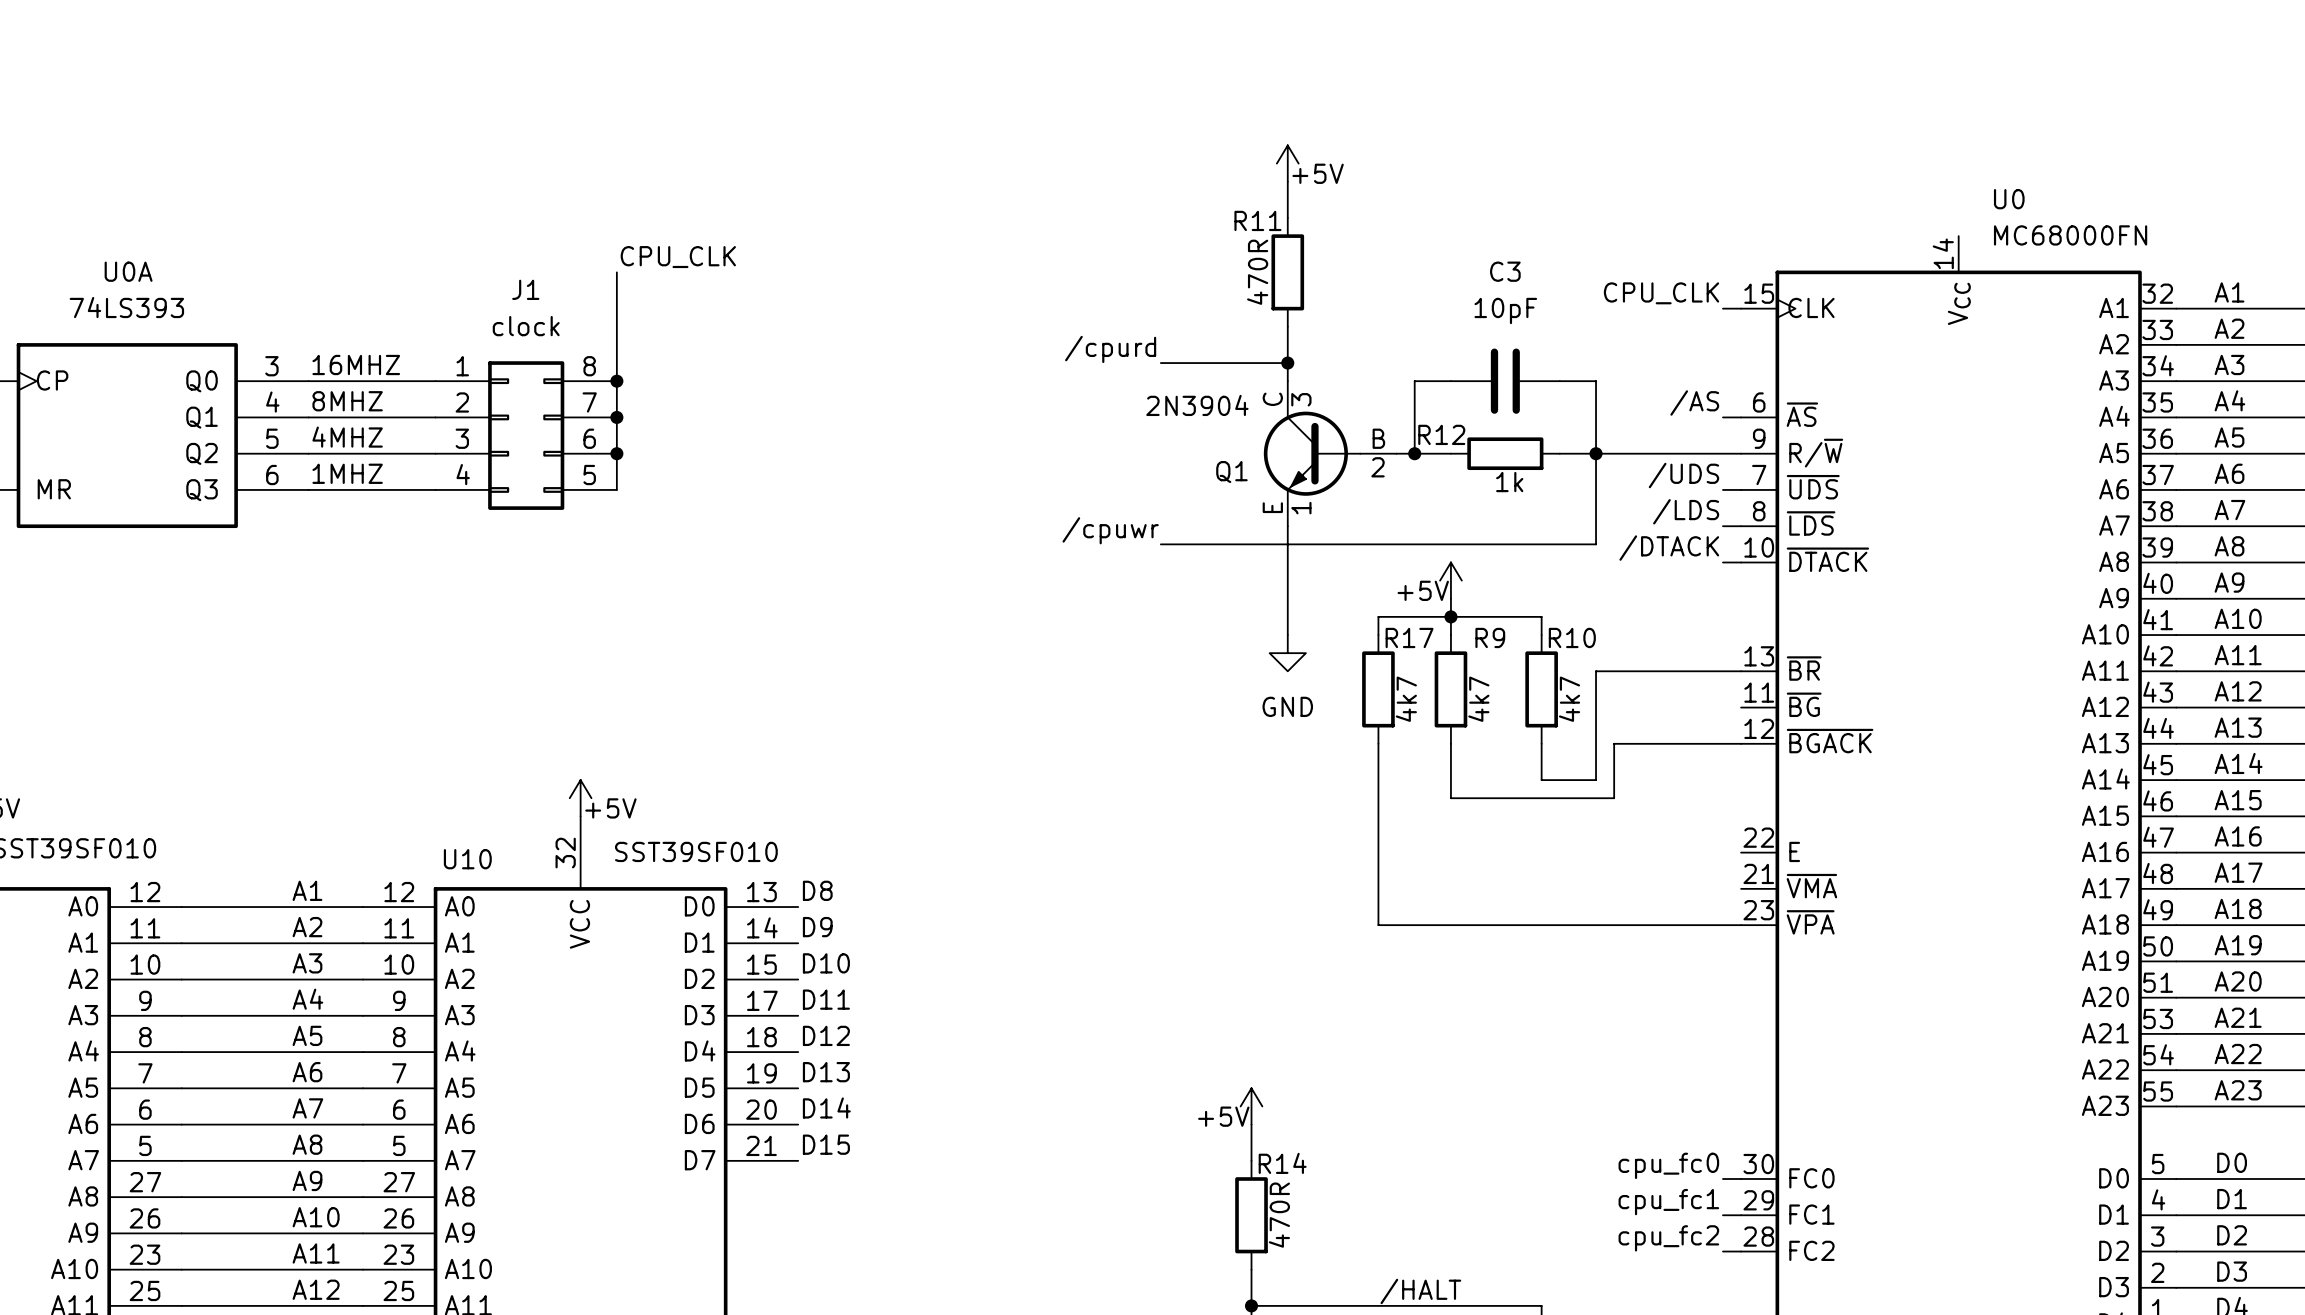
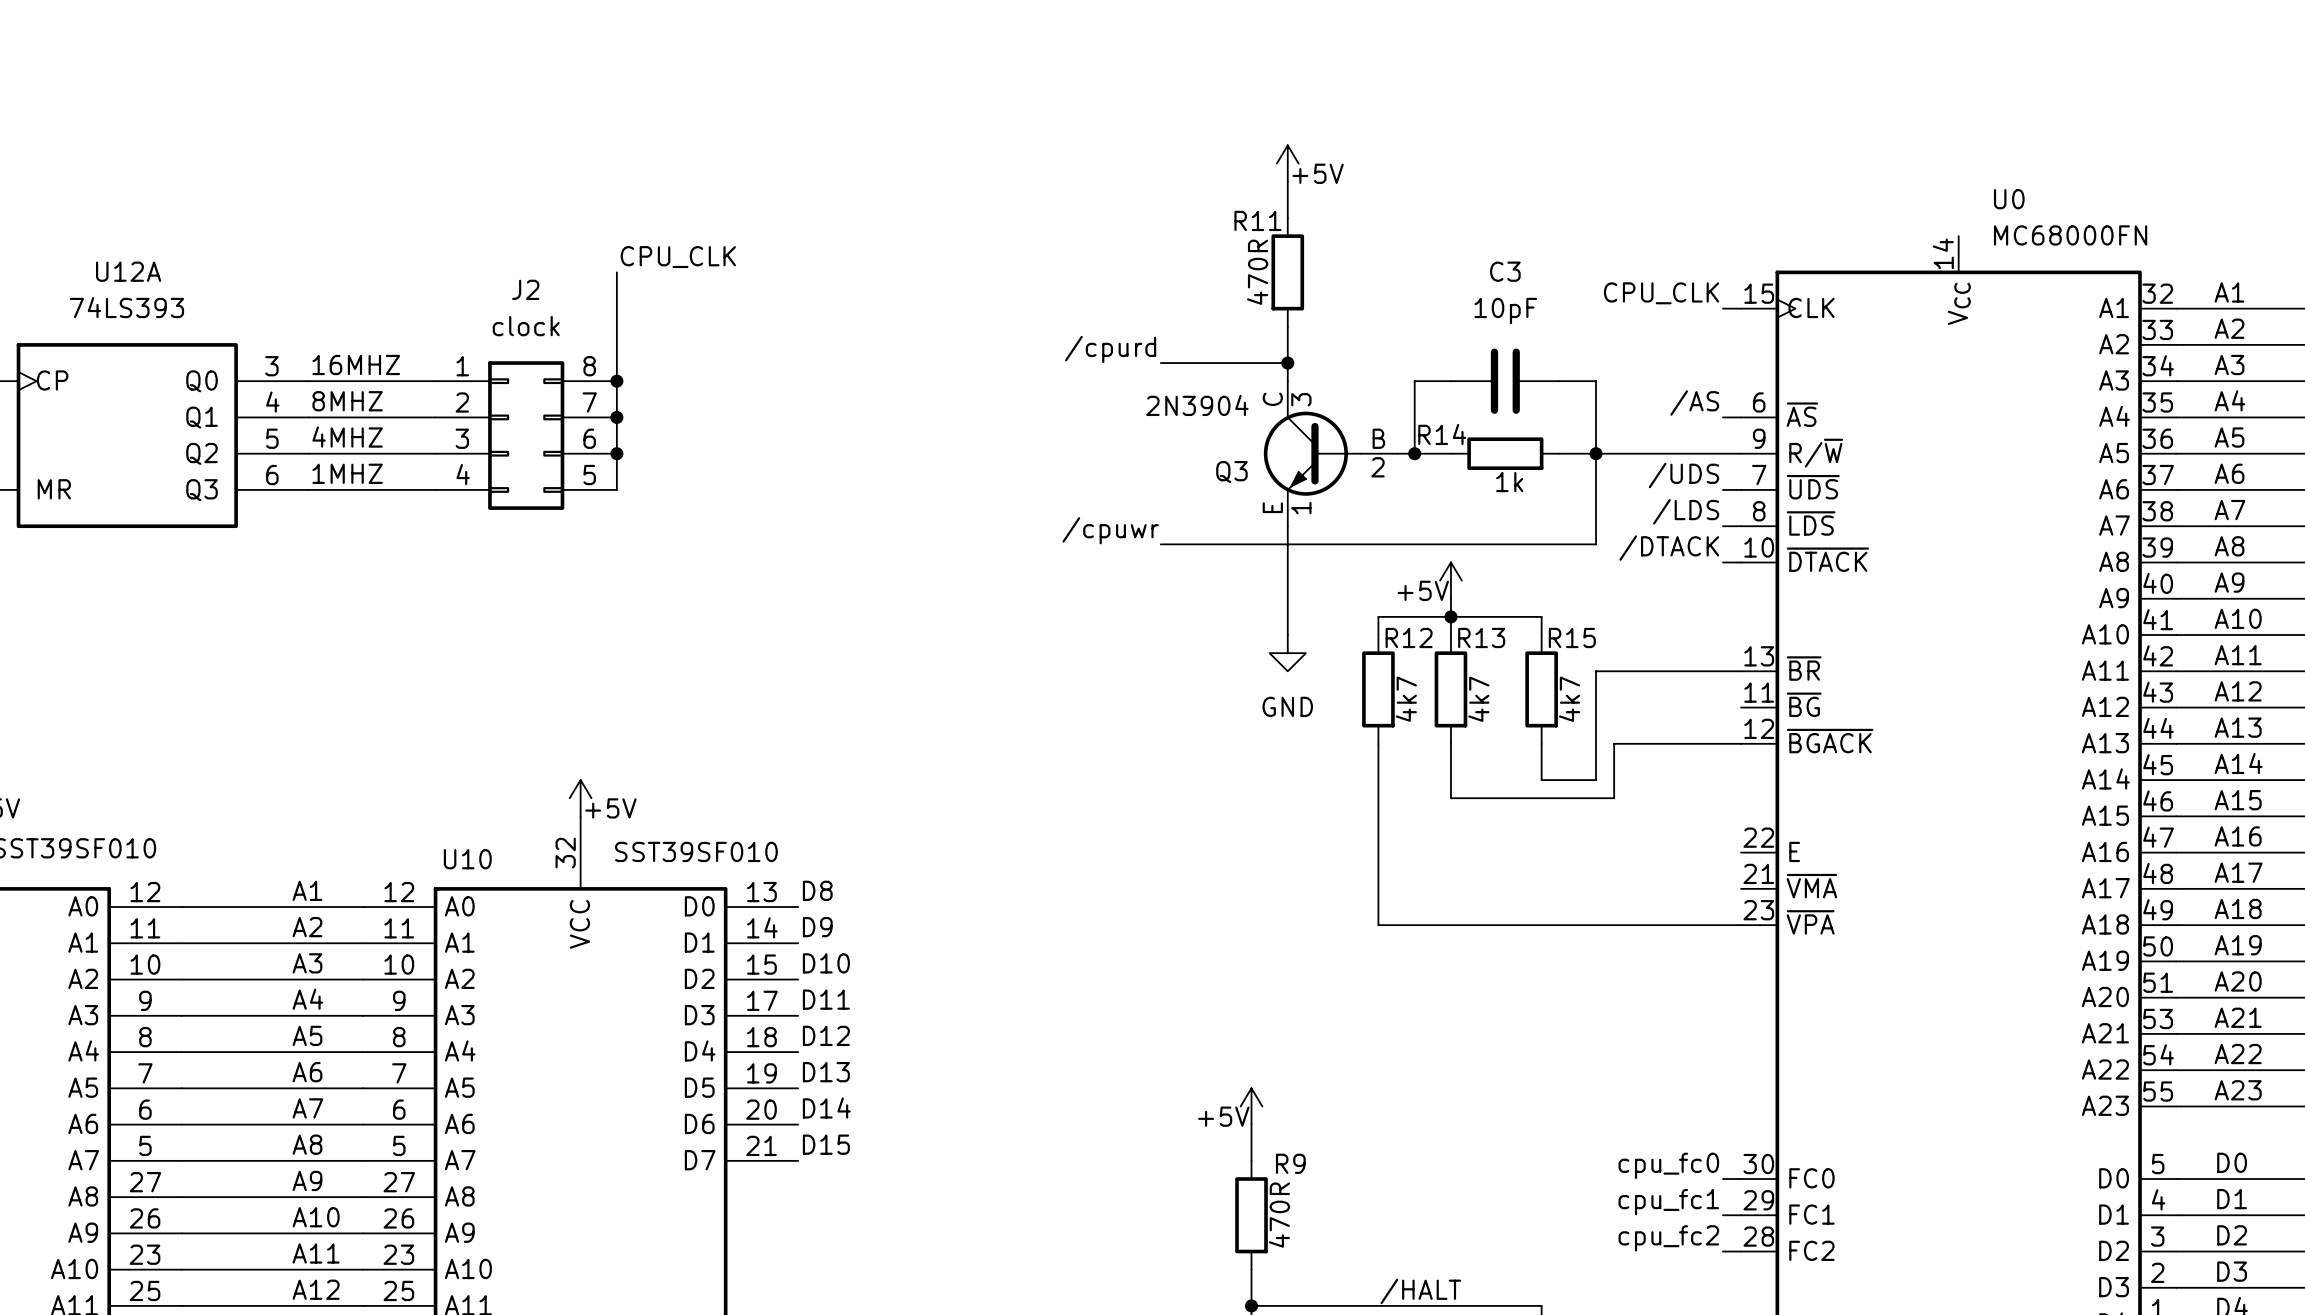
U0A name: U0A (128, 271) -> U12A (128, 271)
J1 name: J1 (525, 289) -> J2 (525, 289)
R12 name: R12 (1441, 434) -> R14 (1442, 434)
Q1 name: Q1 (1231, 472) -> Q3 (1231, 472)
R17 name: R17 (1409, 637) -> R12 (1409, 637)
R9 name: R9 (1490, 637) -> R13 (1481, 637)
R10 name: R10 (1572, 637) -> R15 (1572, 637)
R14 name: R14 (1282, 1163) -> R9 (1290, 1163)

